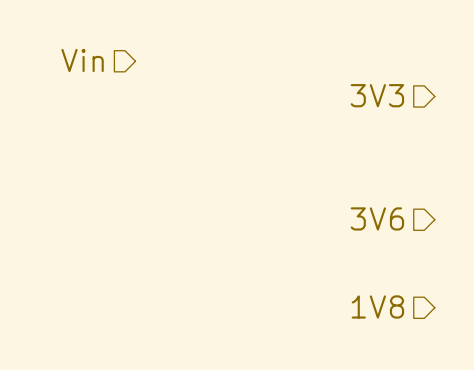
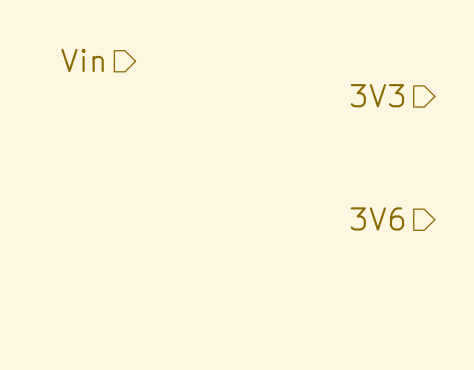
hierarchical label: 1V8 (377, 306) -> none

